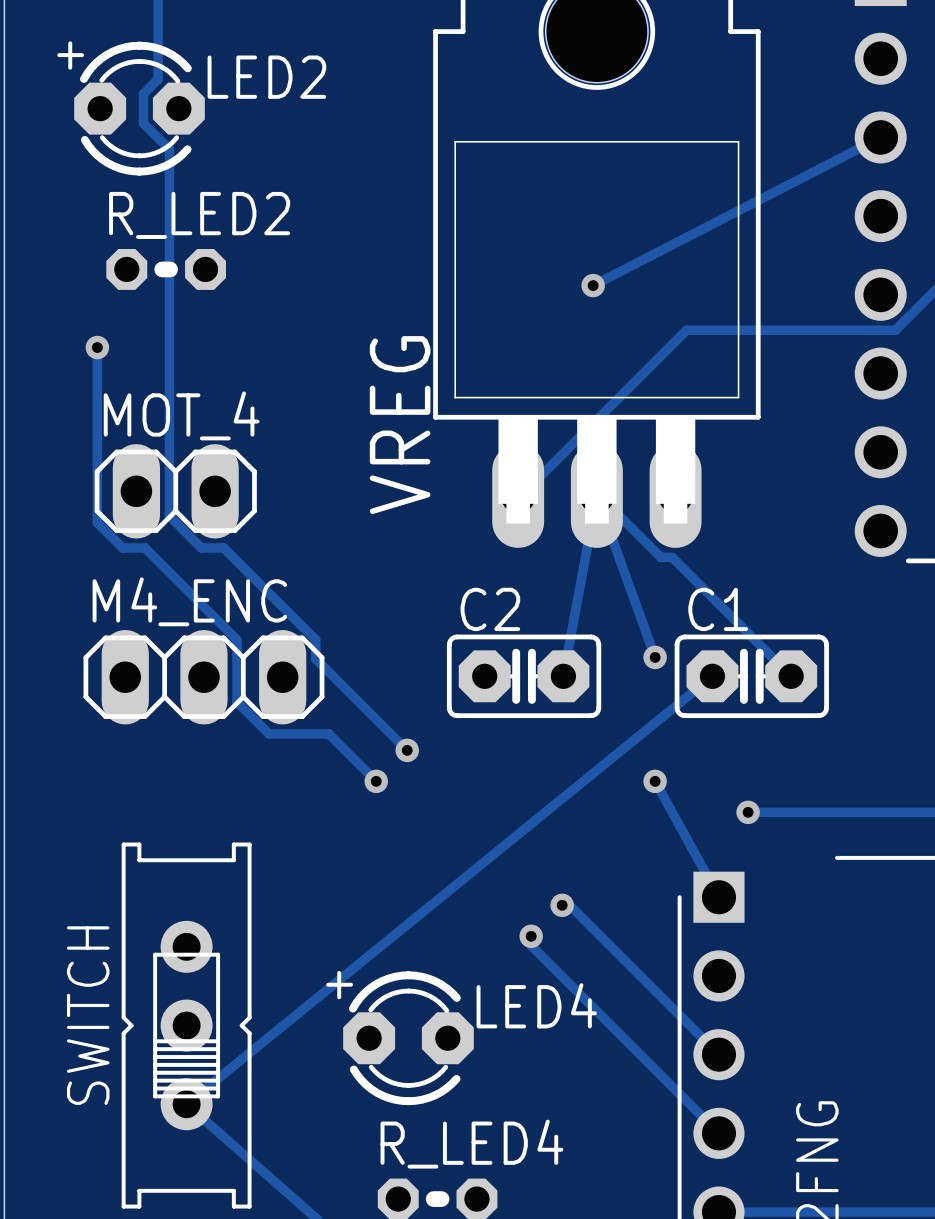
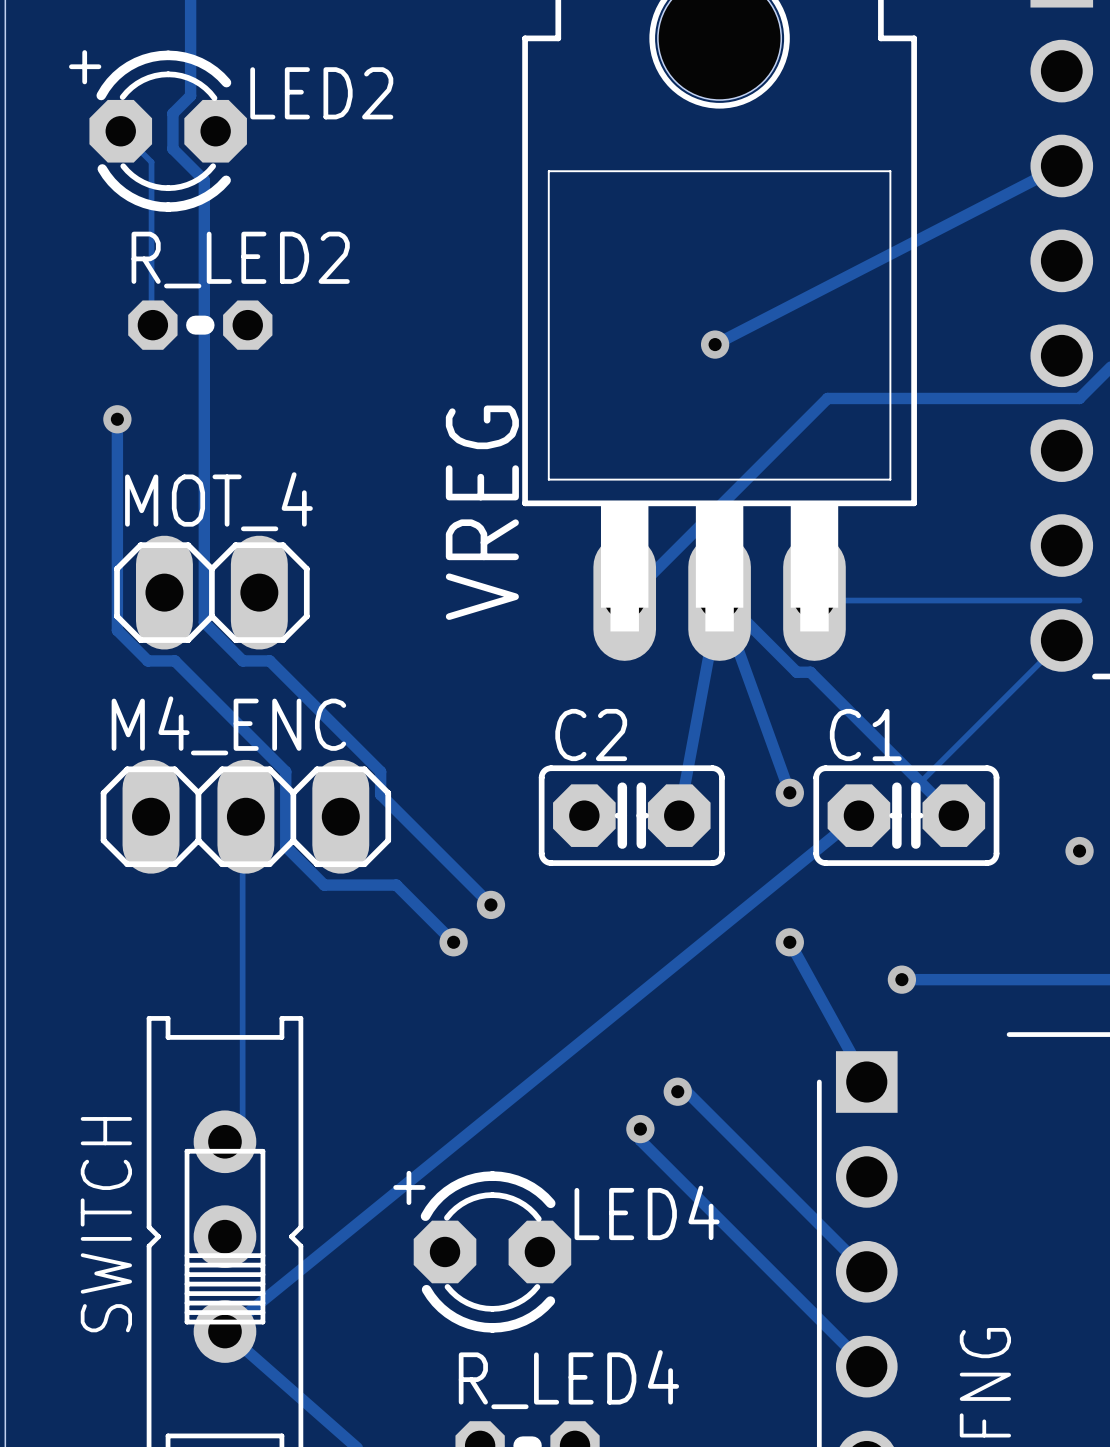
track: none -> (120, 131) (151, 162) (152, 325)
track: none -> (814, 598) (817, 600) (1079, 600)
track: none -> (1061, 640) (920, 782)
track: none -> (245, 816) (242, 816) (242, 1124) (225, 1141)
via: none -> (1079, 851)

